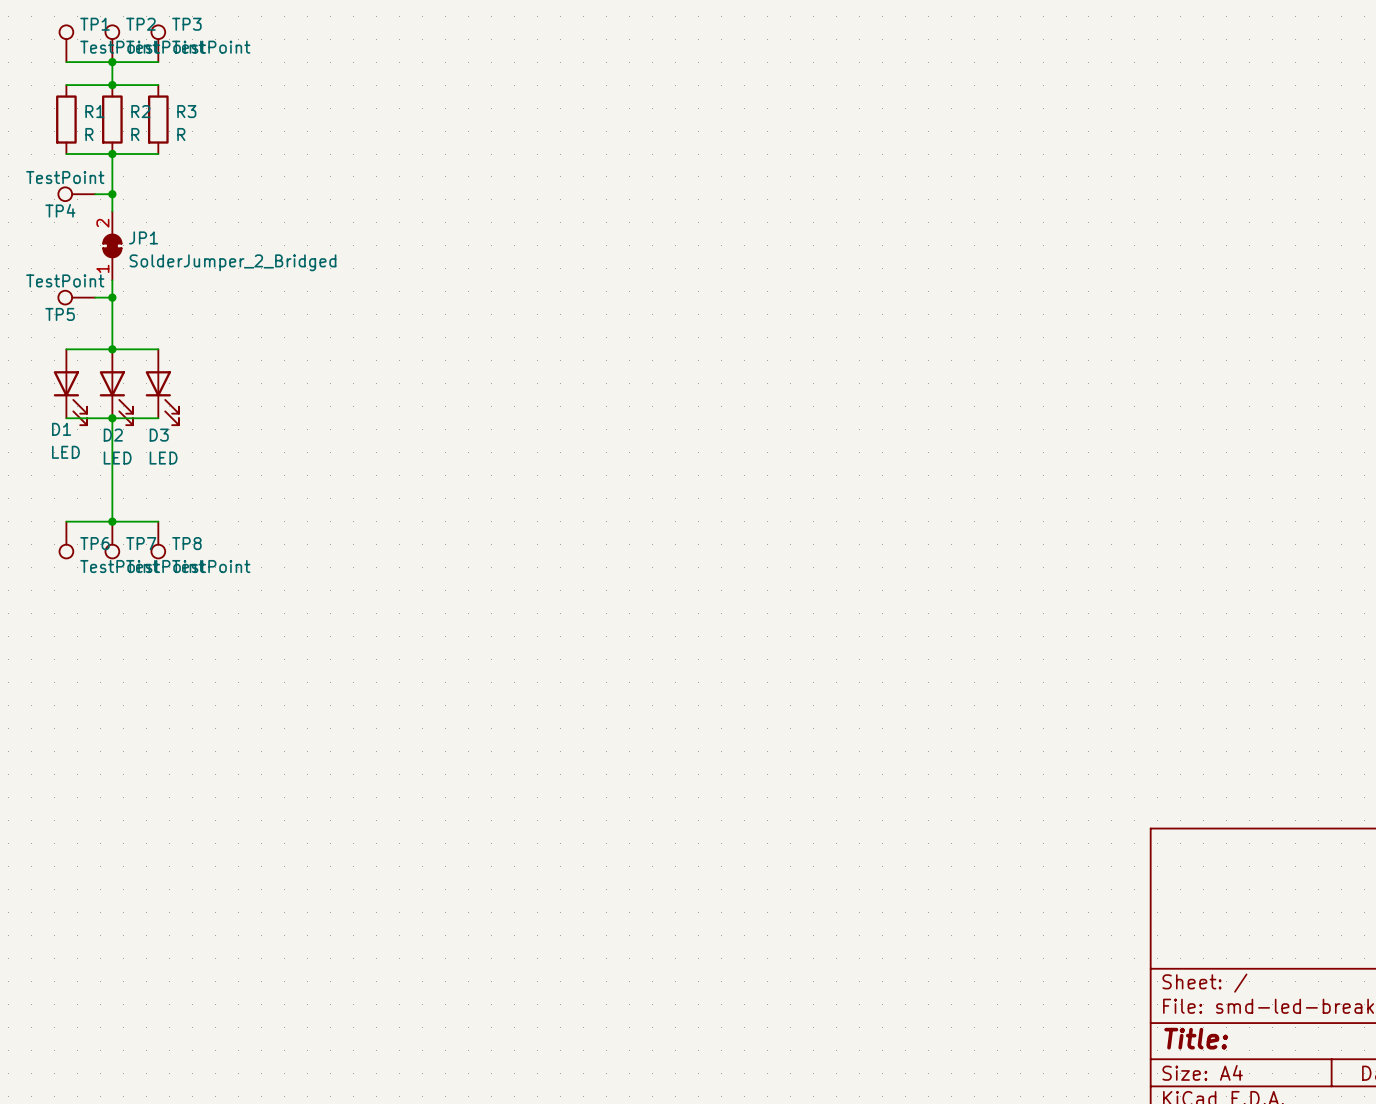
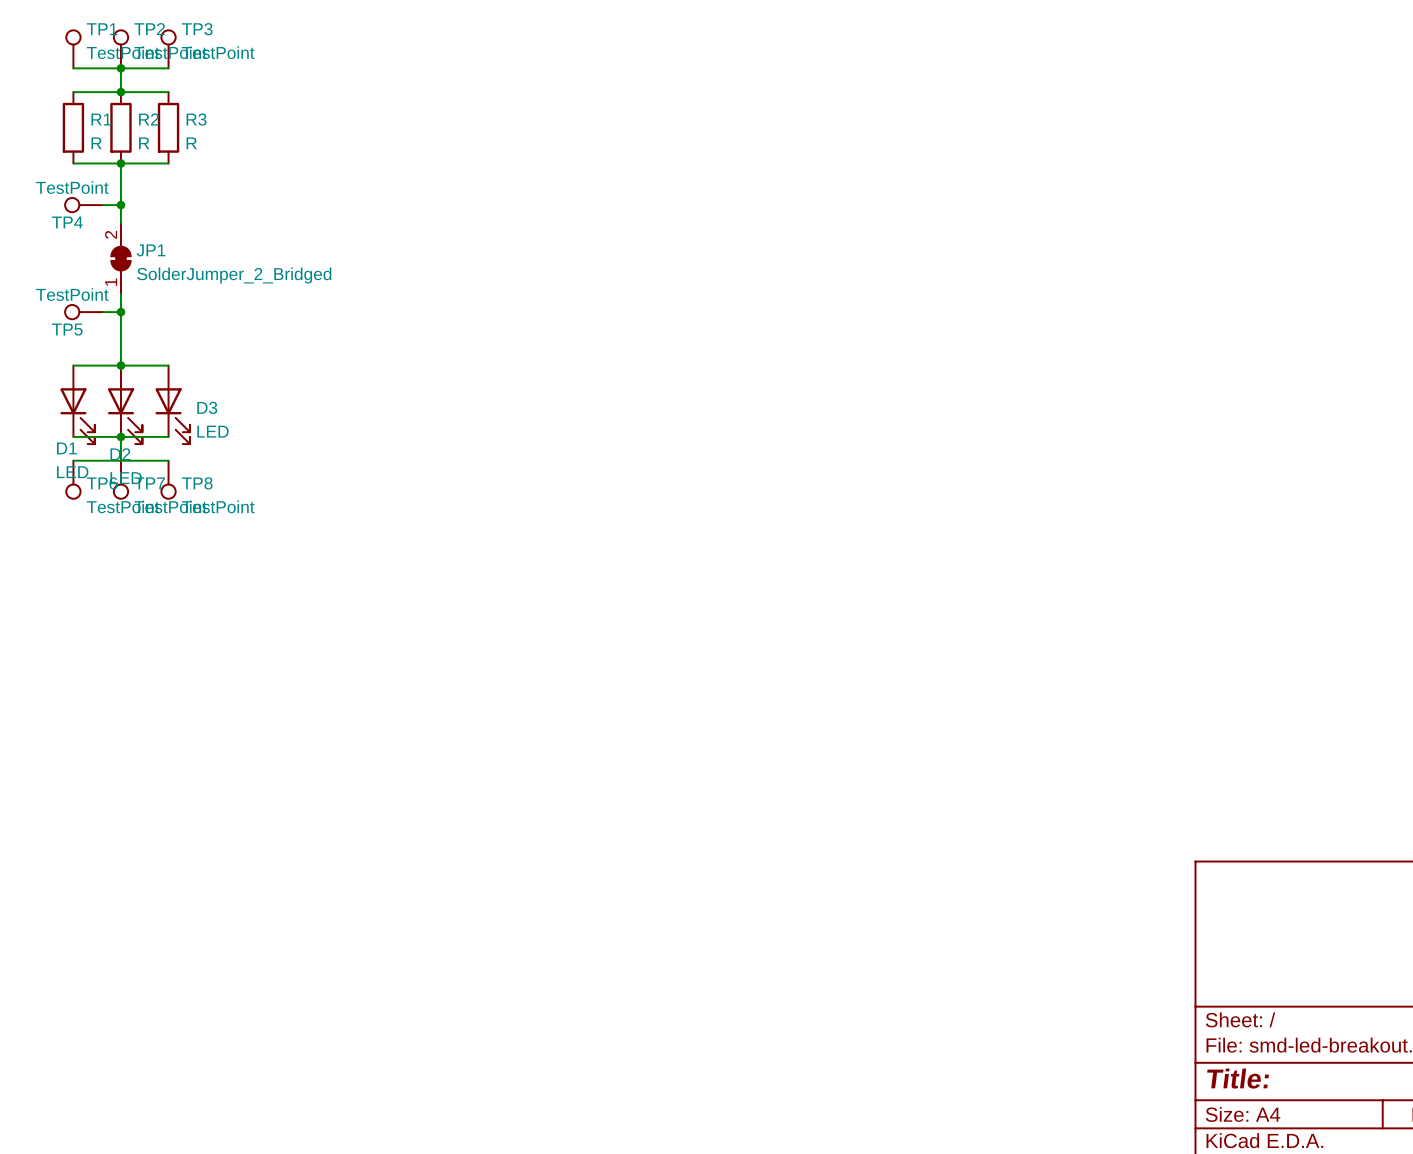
D3 name position: D3 (159, 435) -> D3 (207, 407)
wire: (112, 441) (112, 521) -> none
D3 value position: LED (163, 458) -> LED (212, 431)
wire: (66, 521) (158, 521) -> (73, 460) (168, 460)
junction: (112, 521) -> none
TP6 position: (66, 540) -> (73, 479)
TP7 position: (112, 540) -> (120, 479)
TP8 position: (158, 540) -> (168, 479)

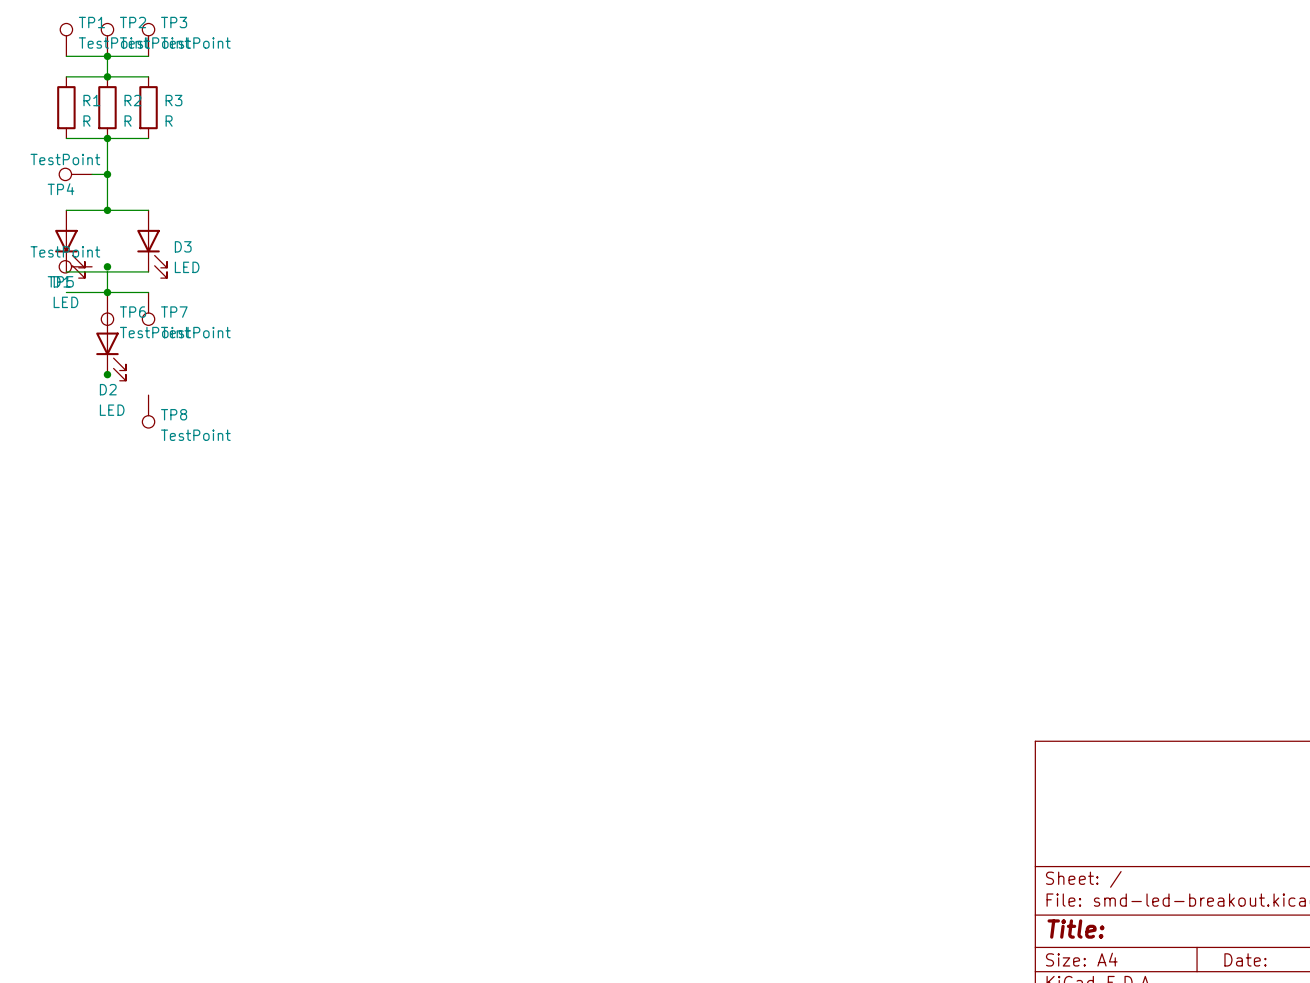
junction: none -> (107, 210)
JP1: SolderJumper_2_Bridged (120, 258) -> none
wire: (120, 294) (120, 318) -> none
wire: (103, 312) (120, 312) -> none
wire: (73, 365) (168, 365) -> (66, 210) (148, 210)
junction position: (120, 365) -> (107, 292)
D1 position: (77, 404) -> (69, 244)
D3 position: (172, 404) -> (152, 244)
wire: (73, 436) (168, 436) -> (66, 271) (148, 271)
wire: (120, 436) (120, 460) -> none
wire: (73, 460) (168, 460) -> (66, 292) (148, 292)
TP6 position: (73, 479) -> (107, 308)
TP7 position: (120, 479) -> (148, 308)

